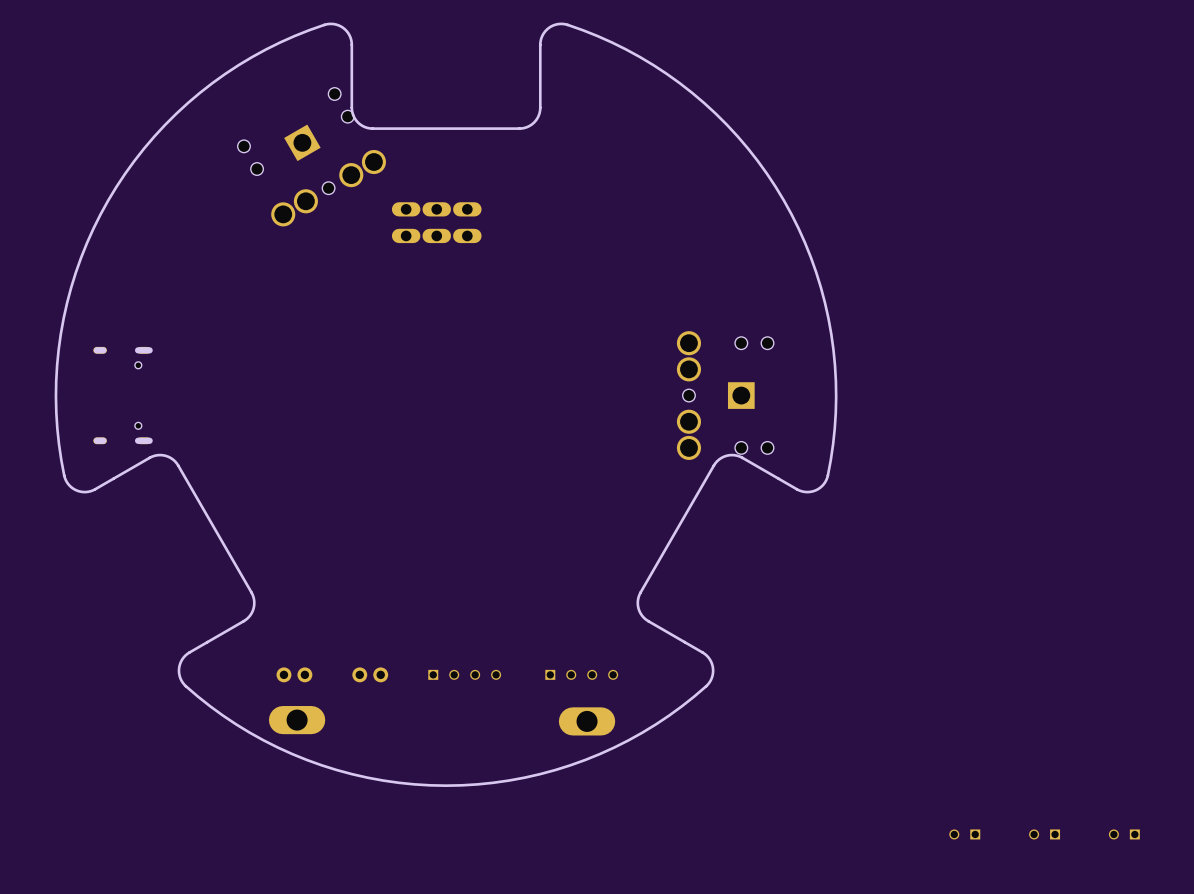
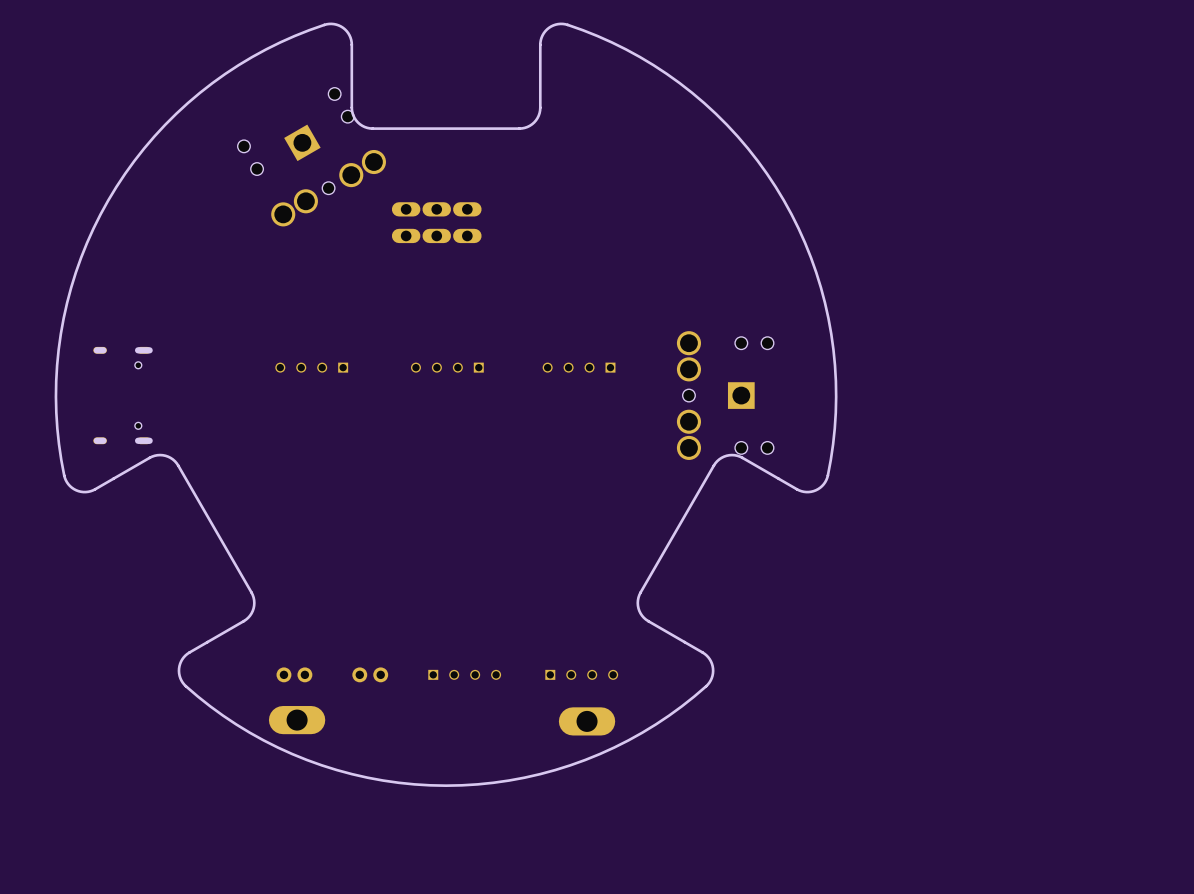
part: none -> (311, 367)
part: none -> (447, 367)
part: none -> (579, 367)
part: (964, 834) -> none
part: (1044, 834) -> none
part: (1124, 834) -> none

